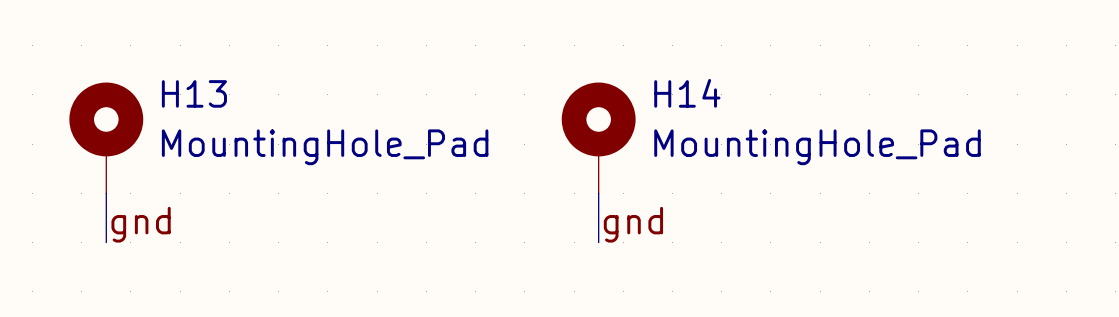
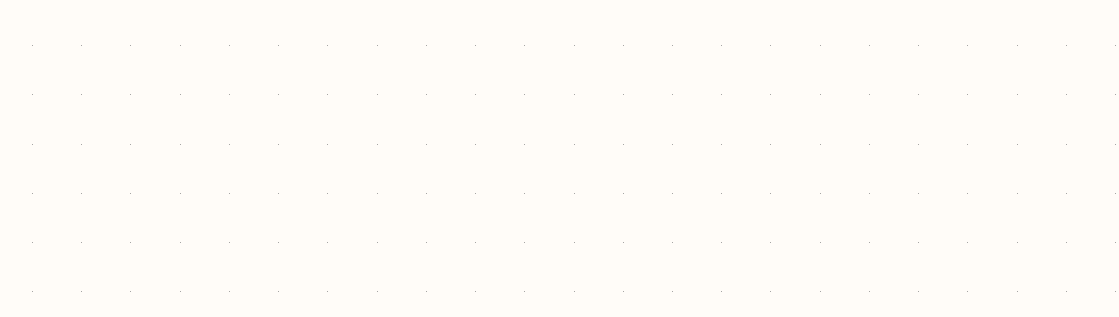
H13: MountingHole_Pad (106, 137) -> none
H14: MountingHole_Pad (598, 137) -> none
wire: (106, 193) (106, 242) -> none
wire: (598, 193) (598, 242) -> none
label: gnd (141, 224) -> none
label: gnd (633, 224) -> none

